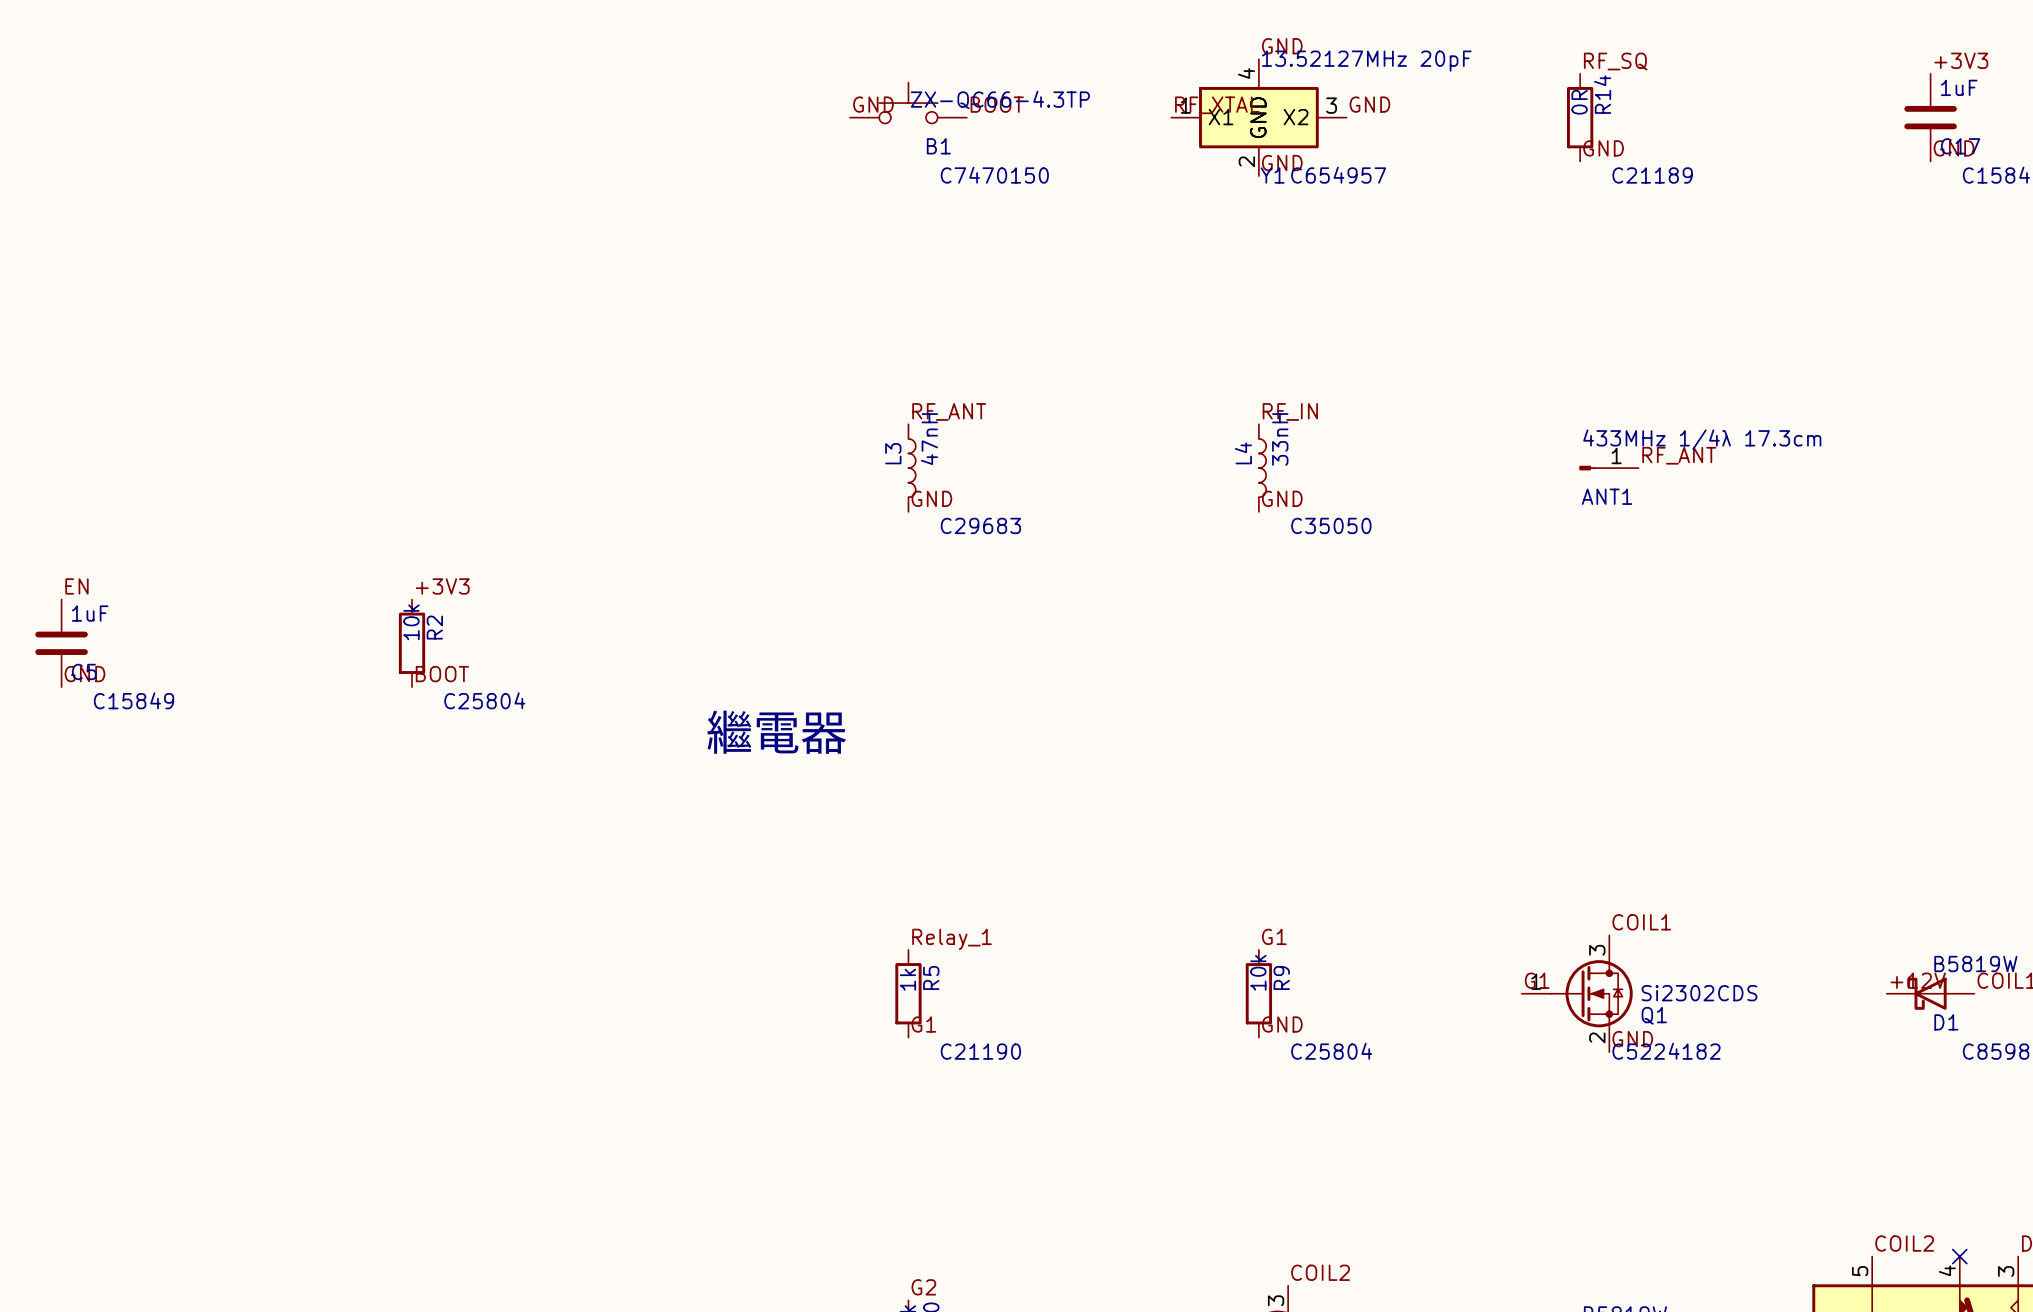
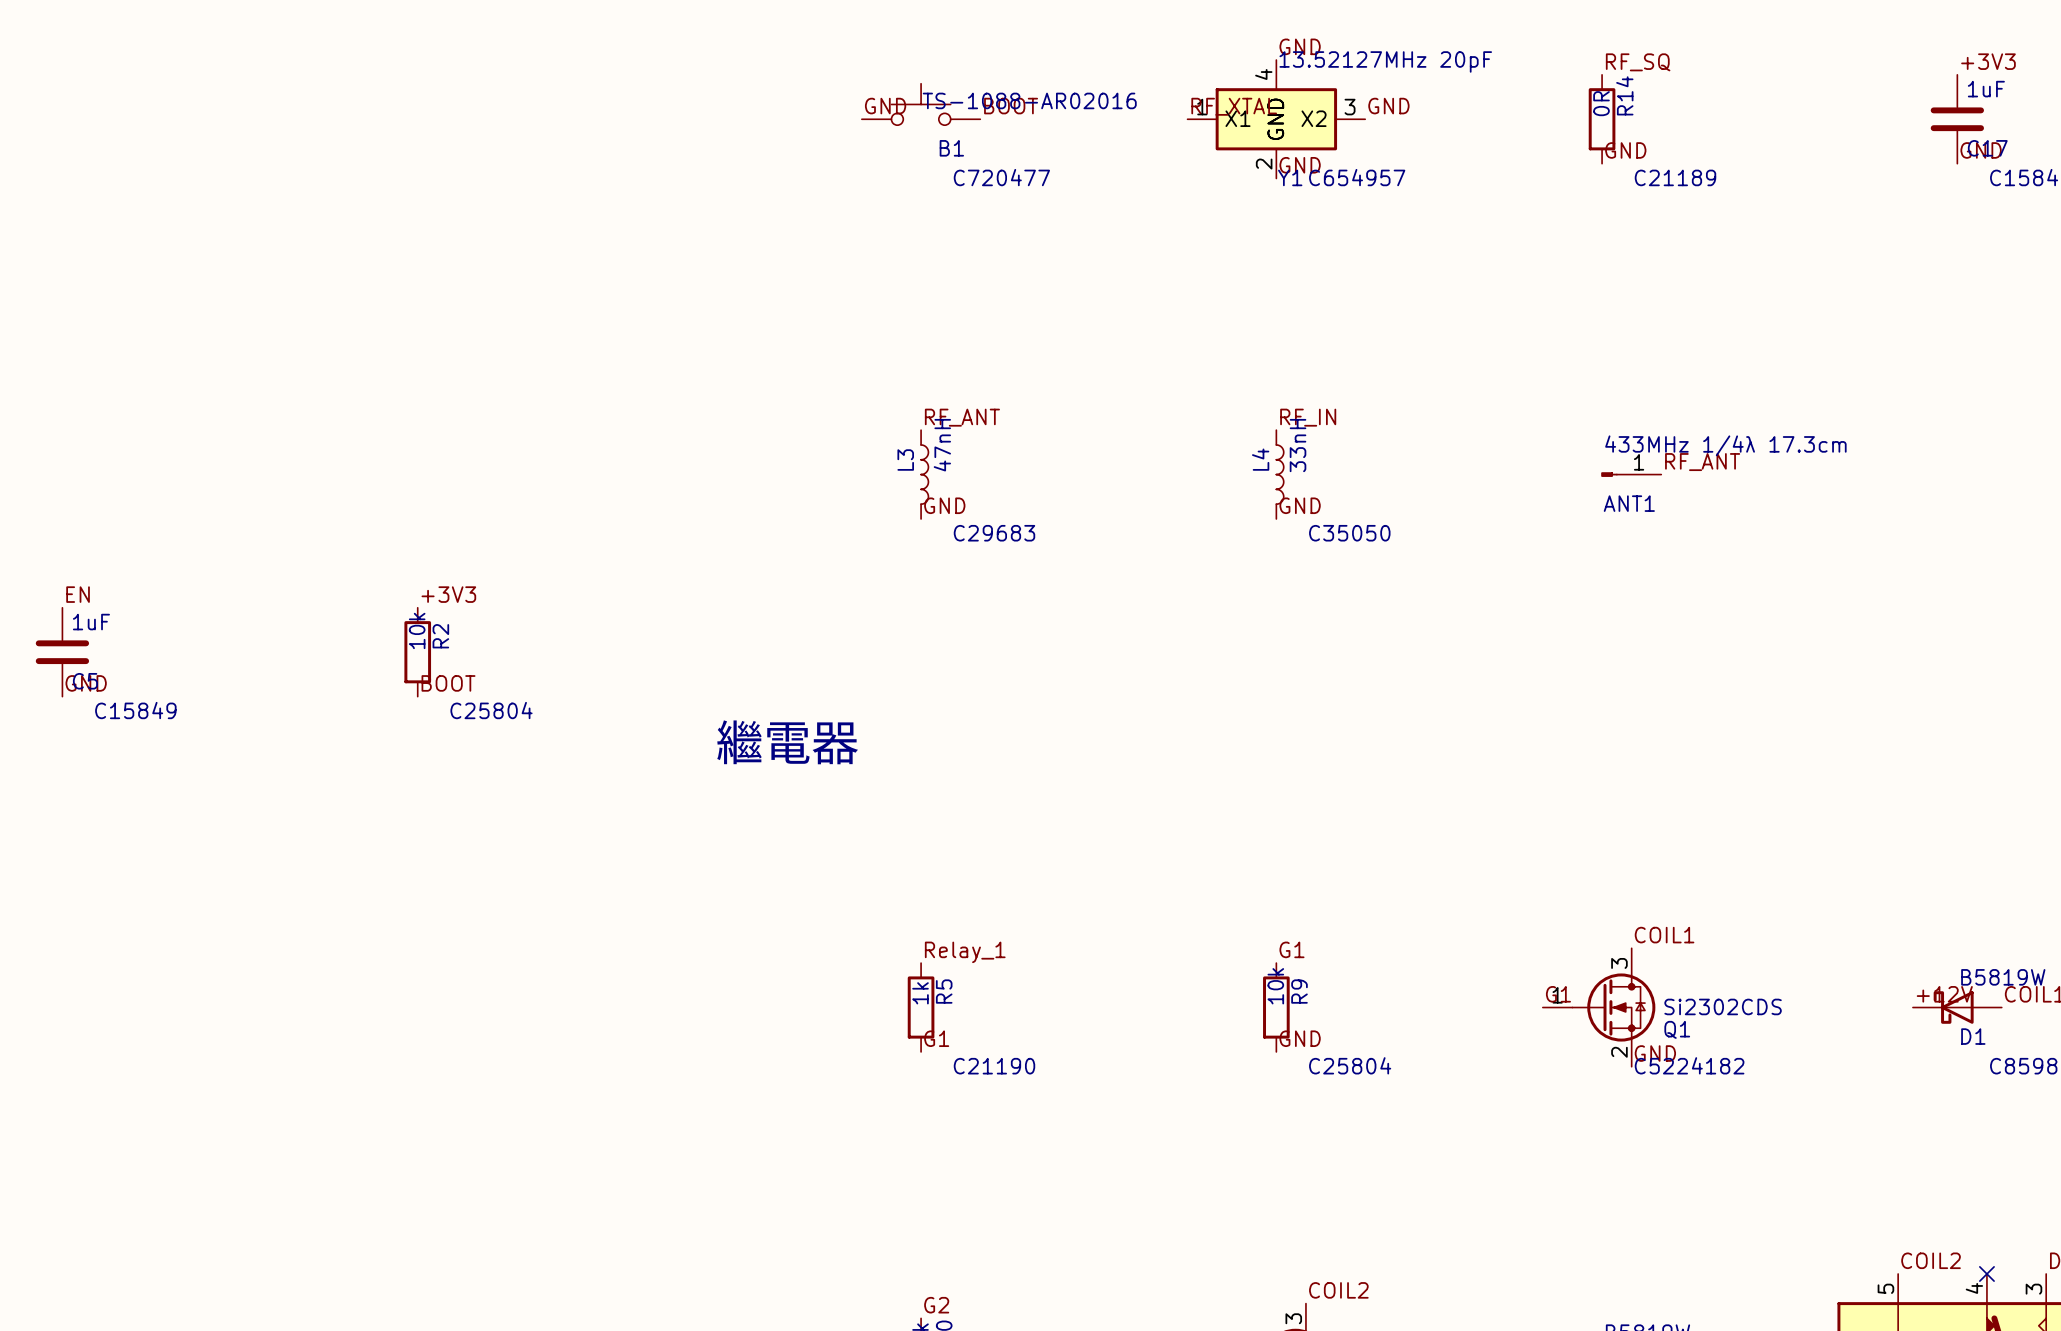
B1 value: ZX-QC66-4.3TP (1000, 99) -> TS-1088-AR02016 (1029, 100)
B1 text: C7470150 (994, 175) -> C720477 (1001, 177)

